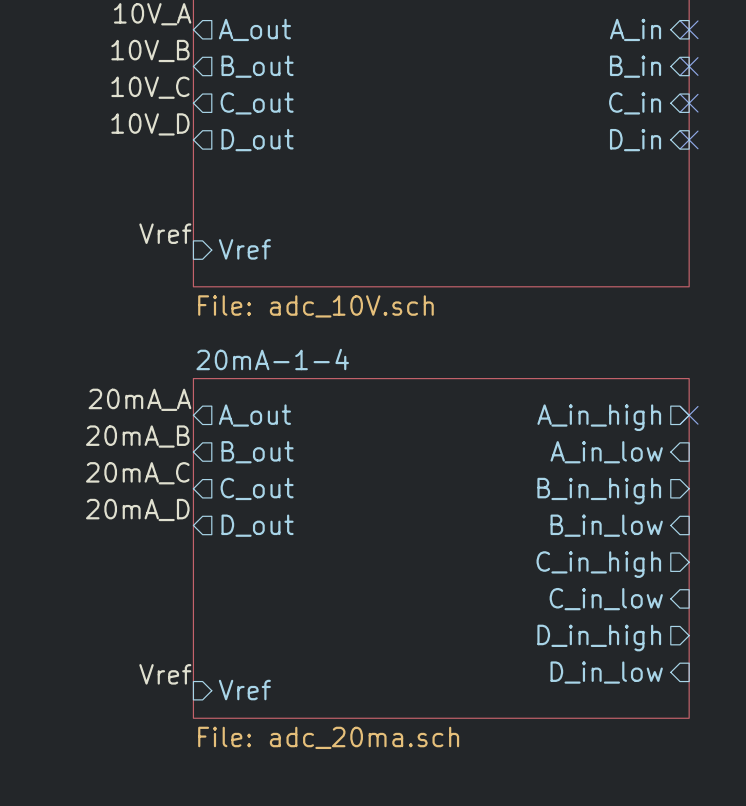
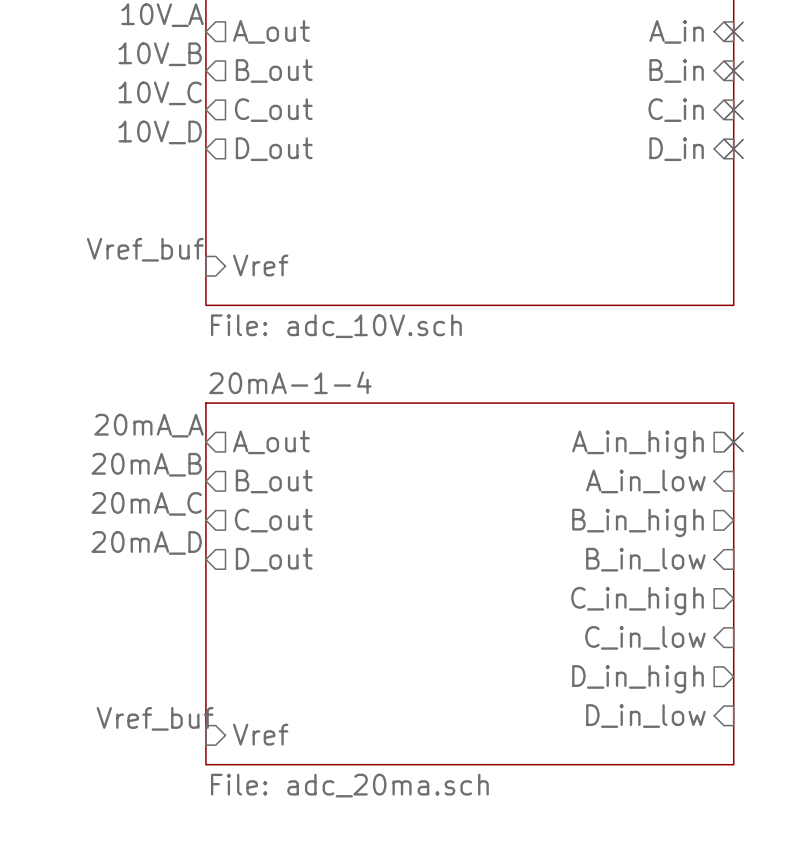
label: Vref (165, 233) -> Vref_buf (145, 249)
label: Vref (165, 674) -> Vref_buf (155, 718)

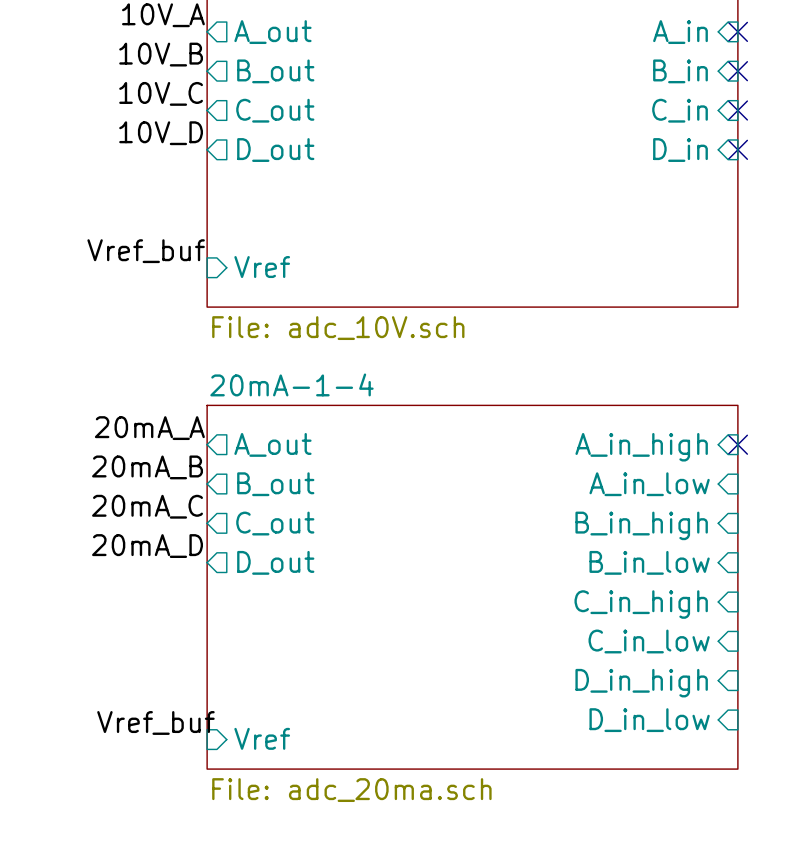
sheet pin shape: output (637, 444) -> input (641, 447)
sheet pin shape: output (637, 522) -> input (641, 525)
sheet pin shape: output (637, 601) -> input (641, 604)
sheet pin shape: output (637, 679) -> input (641, 683)

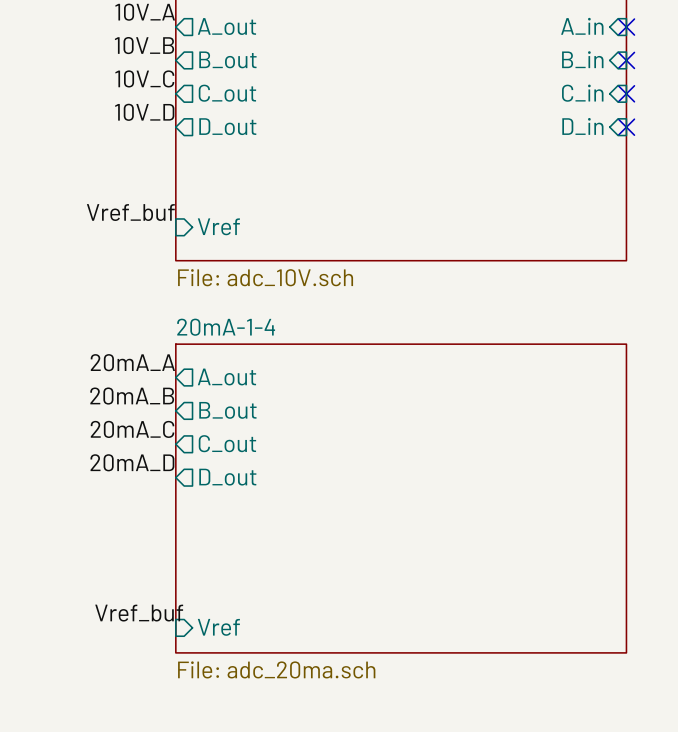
no-connect mark: (737, 444) -> none
sheet pin: A_in_high (641, 447) -> none
sheet pin: A_in_low (649, 484) -> none
sheet pin: B_in_high (641, 525) -> none
sheet pin: B_in_low (649, 562) -> none
sheet pin: C_in_high (641, 604) -> none
sheet pin: C_in_low (649, 641) -> none
sheet pin: D_in_high (641, 683) -> none
sheet pin: D_in_low (649, 720) -> none

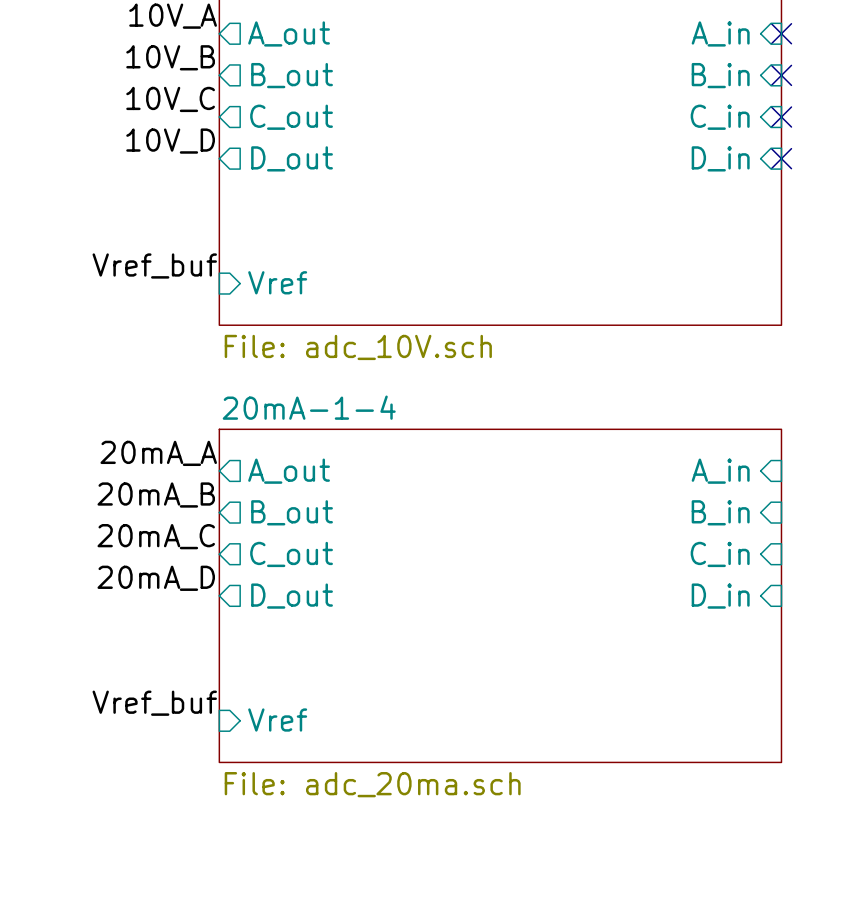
sheet 20mA-1-4 shape: [175, 344, 627, 653] -> [219, 429, 782, 763]
sheet pin: none -> A_in (720, 471)
sheet pin: none -> B_in (720, 512)
sheet pin: none -> C_in (720, 554)
sheet pin: none -> D_in (720, 596)
label position: Vref_buf (139, 613) -> Vref_buf (154, 703)
sheet pin position: Vref (218, 627) -> Vref (277, 720)

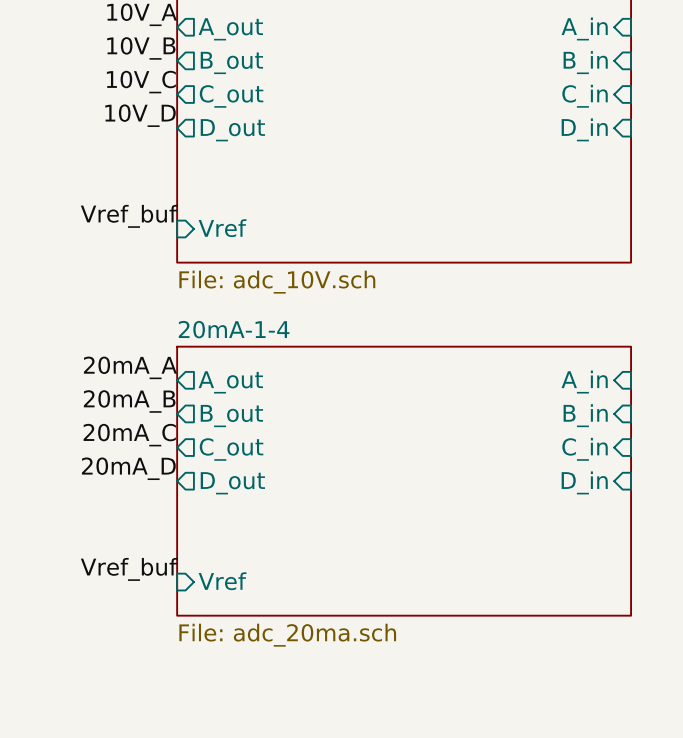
no-connect mark: (781, 33) -> none
no-connect mark: (781, 75) -> none
no-connect mark: (781, 117) -> none
no-connect mark: (781, 158) -> none

